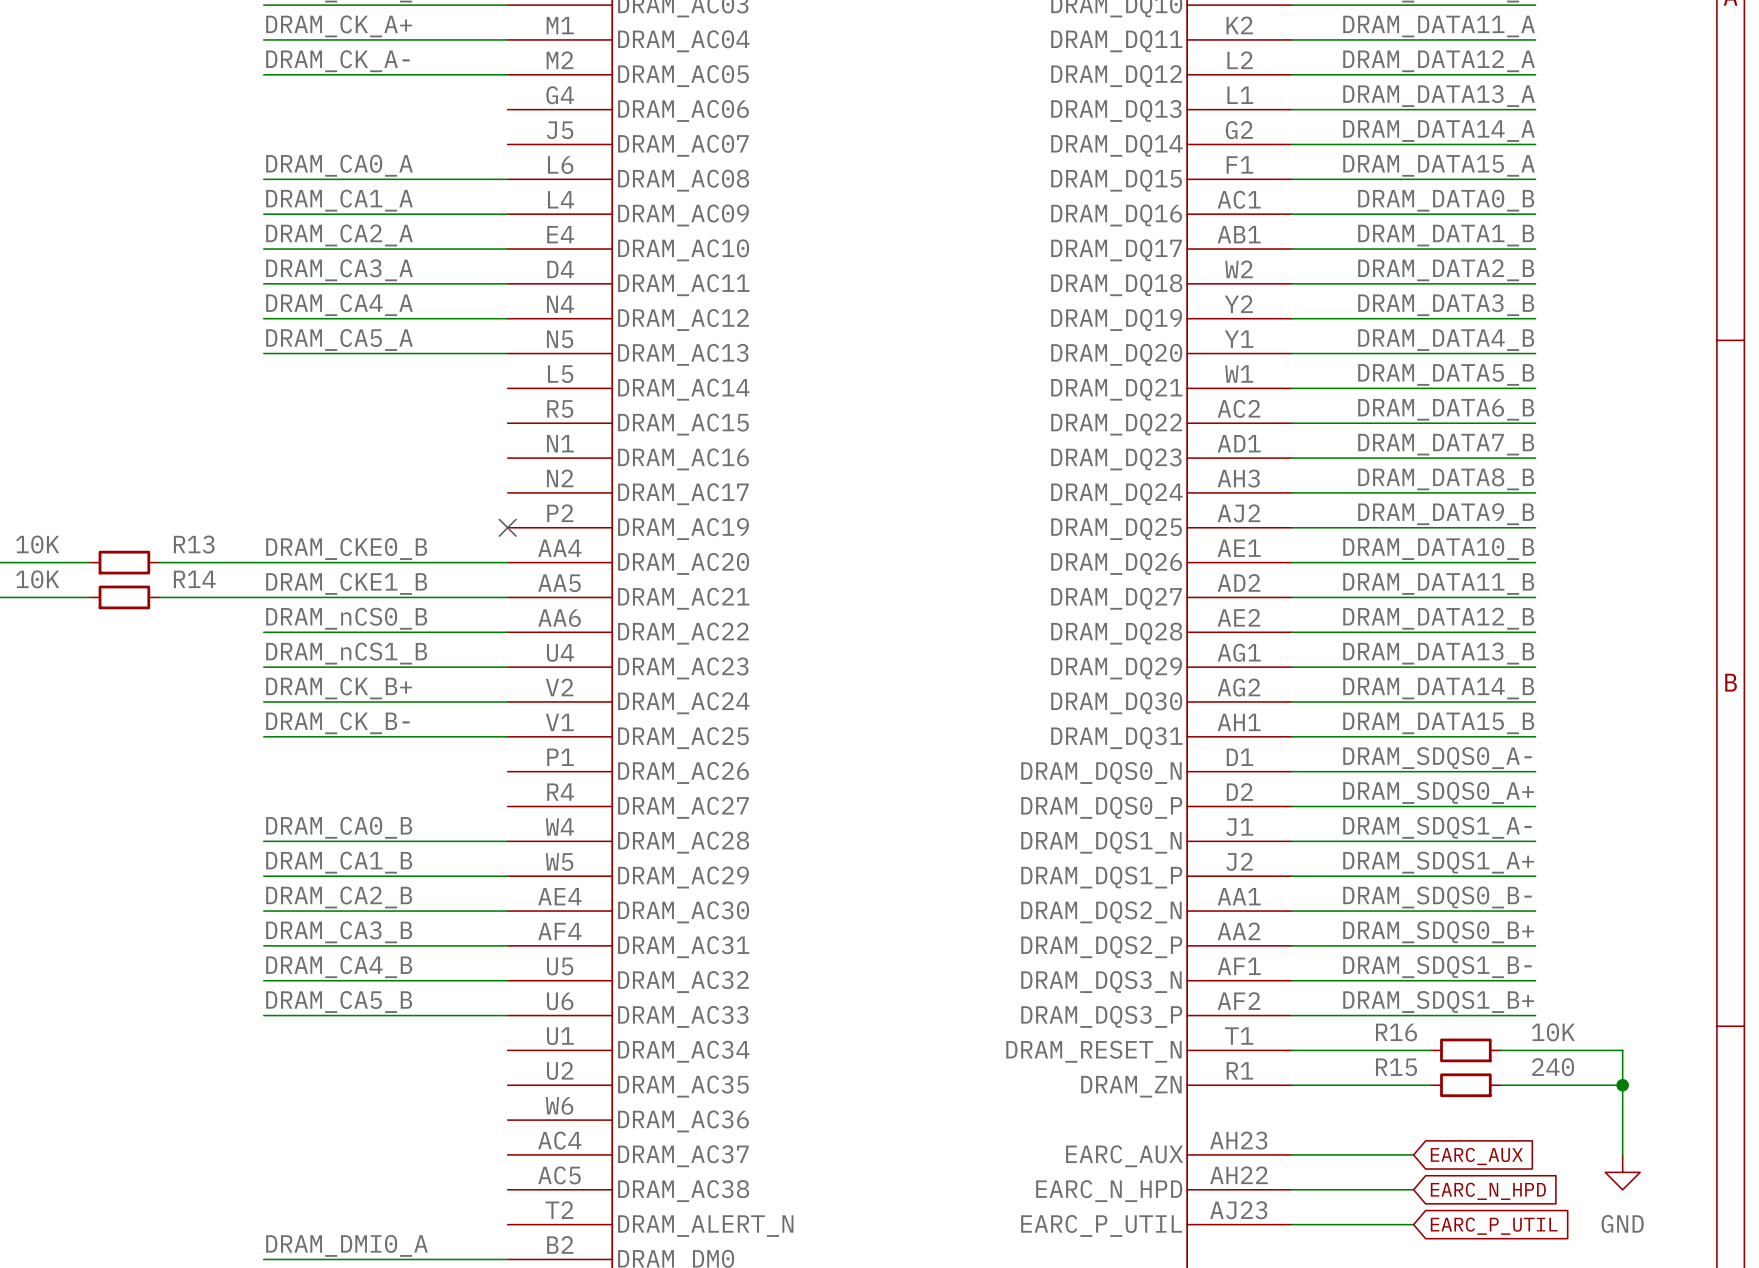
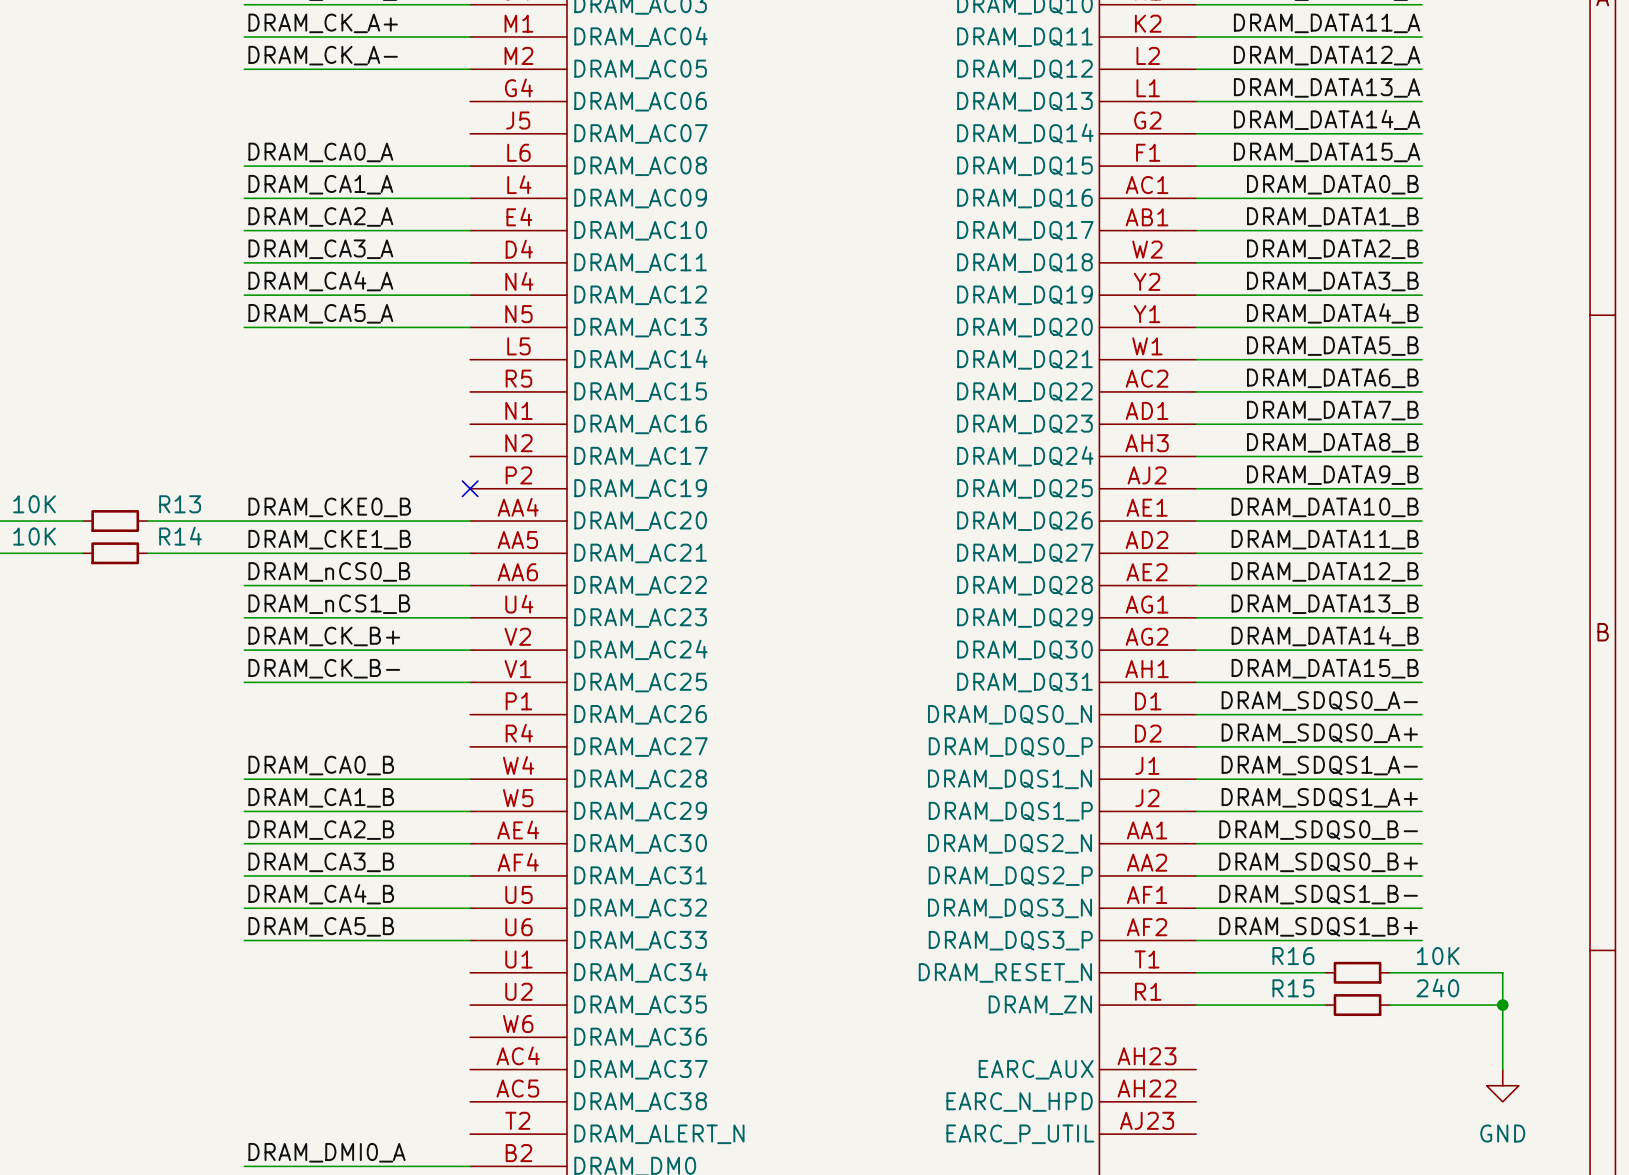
wire: (1291, 1154) (1413, 1154) -> none
global label: EARC_AUX (1476, 1156) -> none
wire: (1291, 1189) (1413, 1189) -> none
global label: EARC_N_HPD (1488, 1191) -> none
wire: (1291, 1224) (1413, 1224) -> none
global label: EARC_P_UTIL (1494, 1226) -> none

